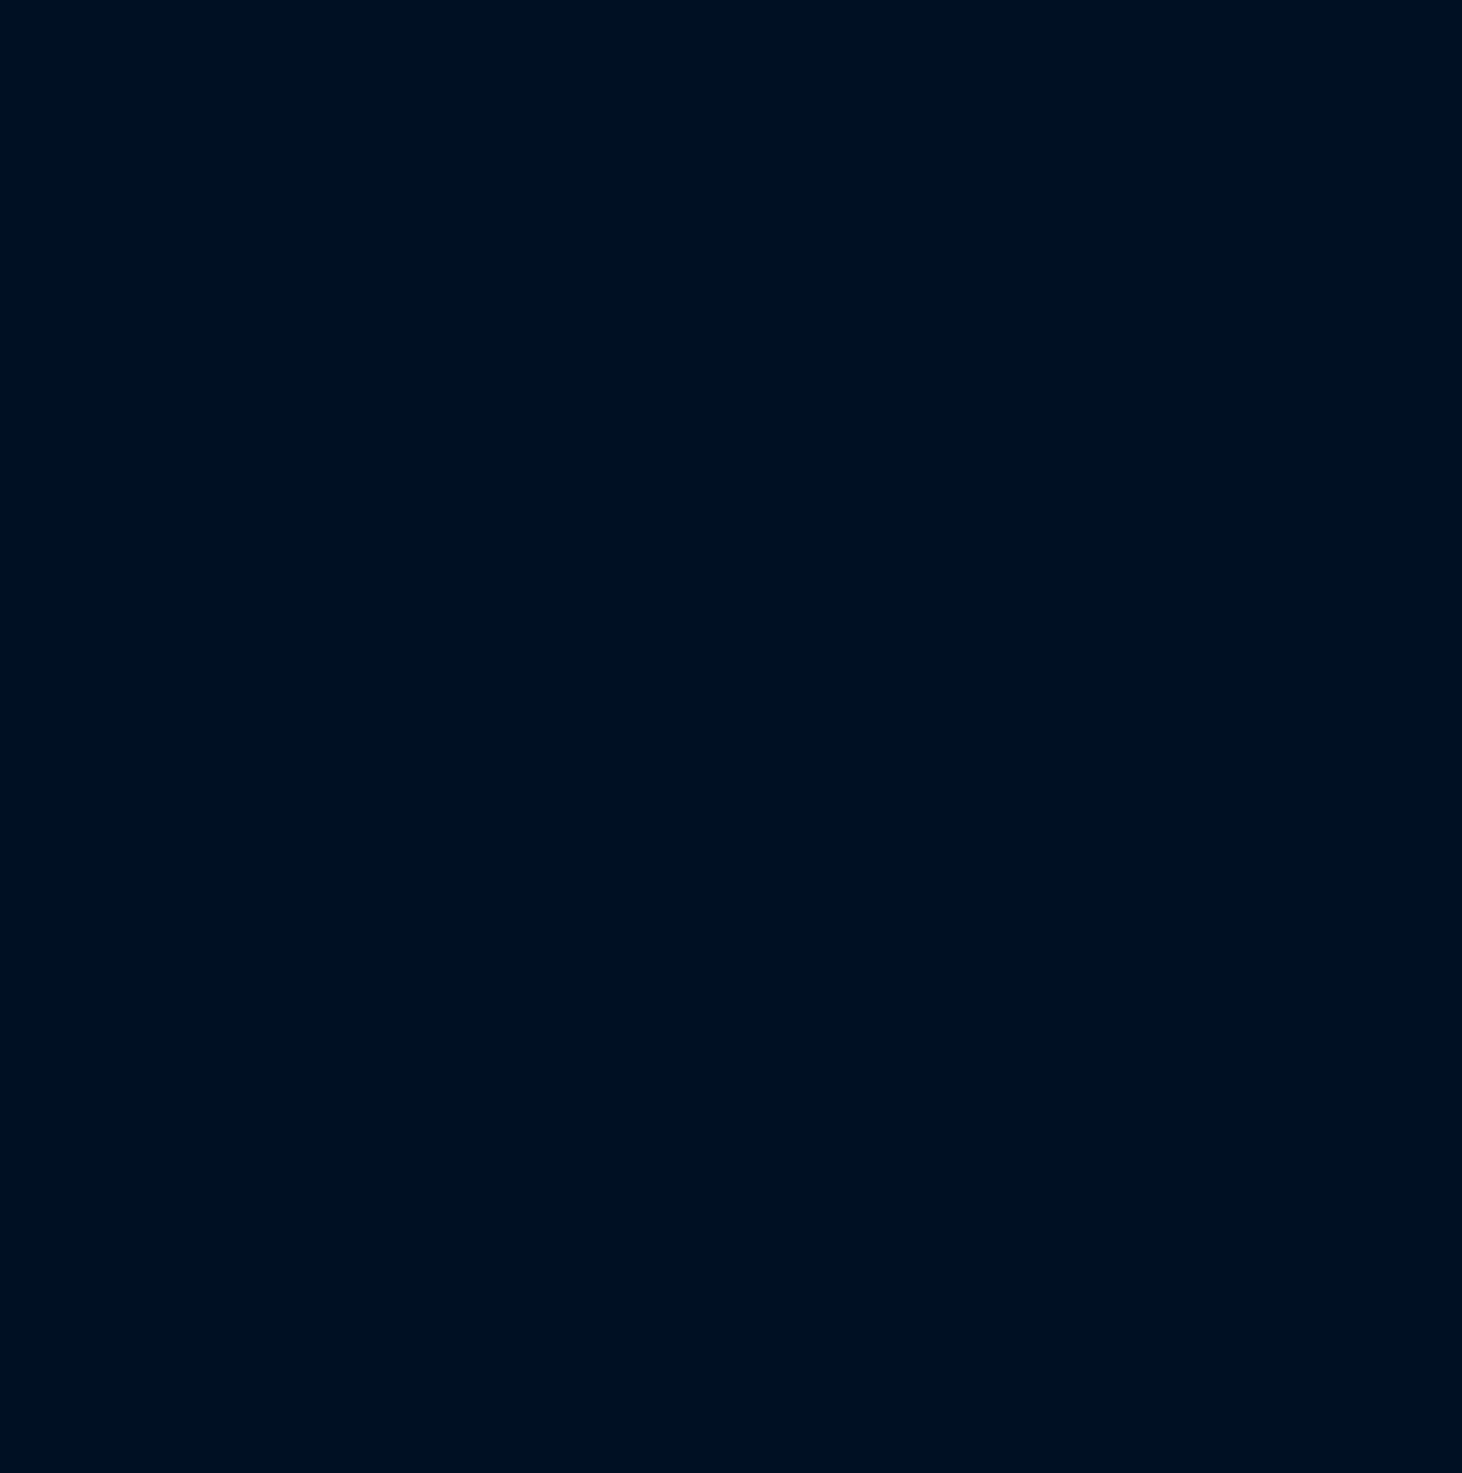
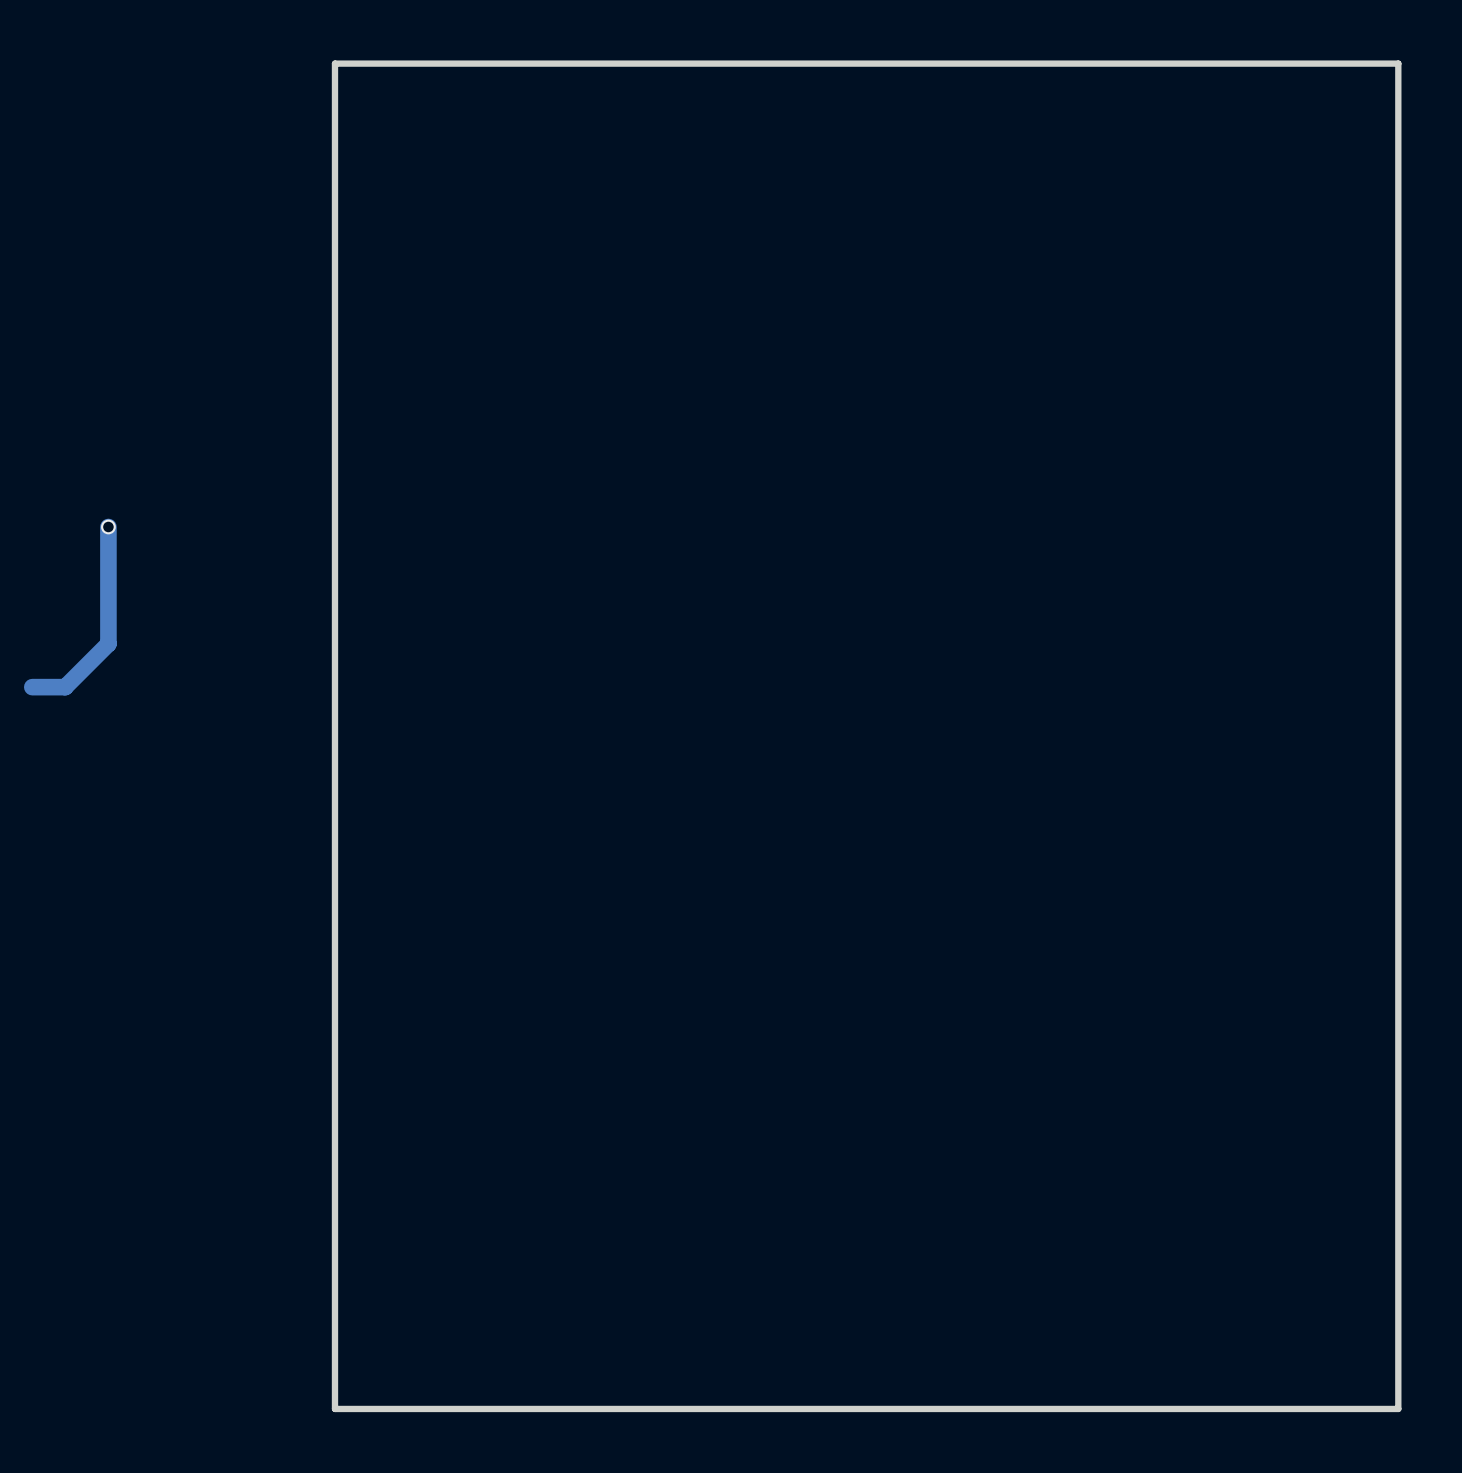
board edge: none -> (1398, 63) (1398, 1408) (334, 1408) (334, 63) (1398, 63)
track: none -> (108, 526) (108, 643) (65, 687) (32, 687)
via: none -> (108, 526)

